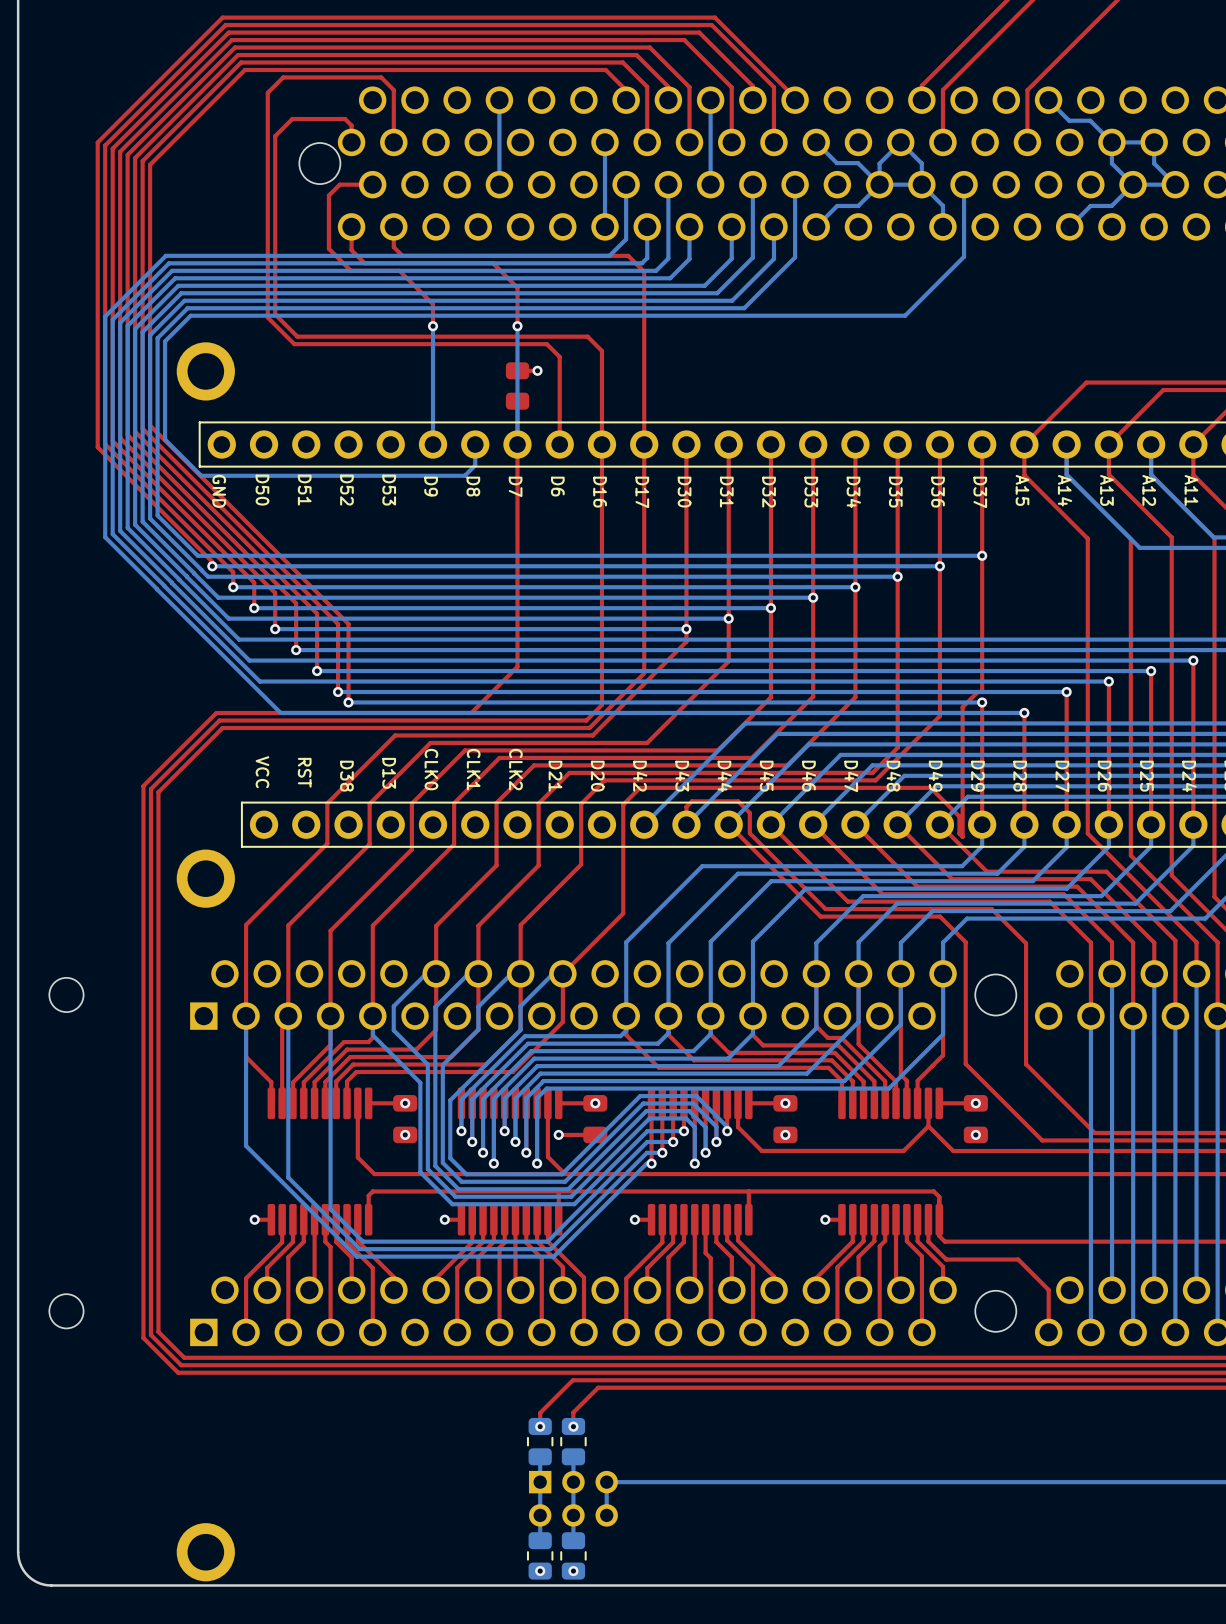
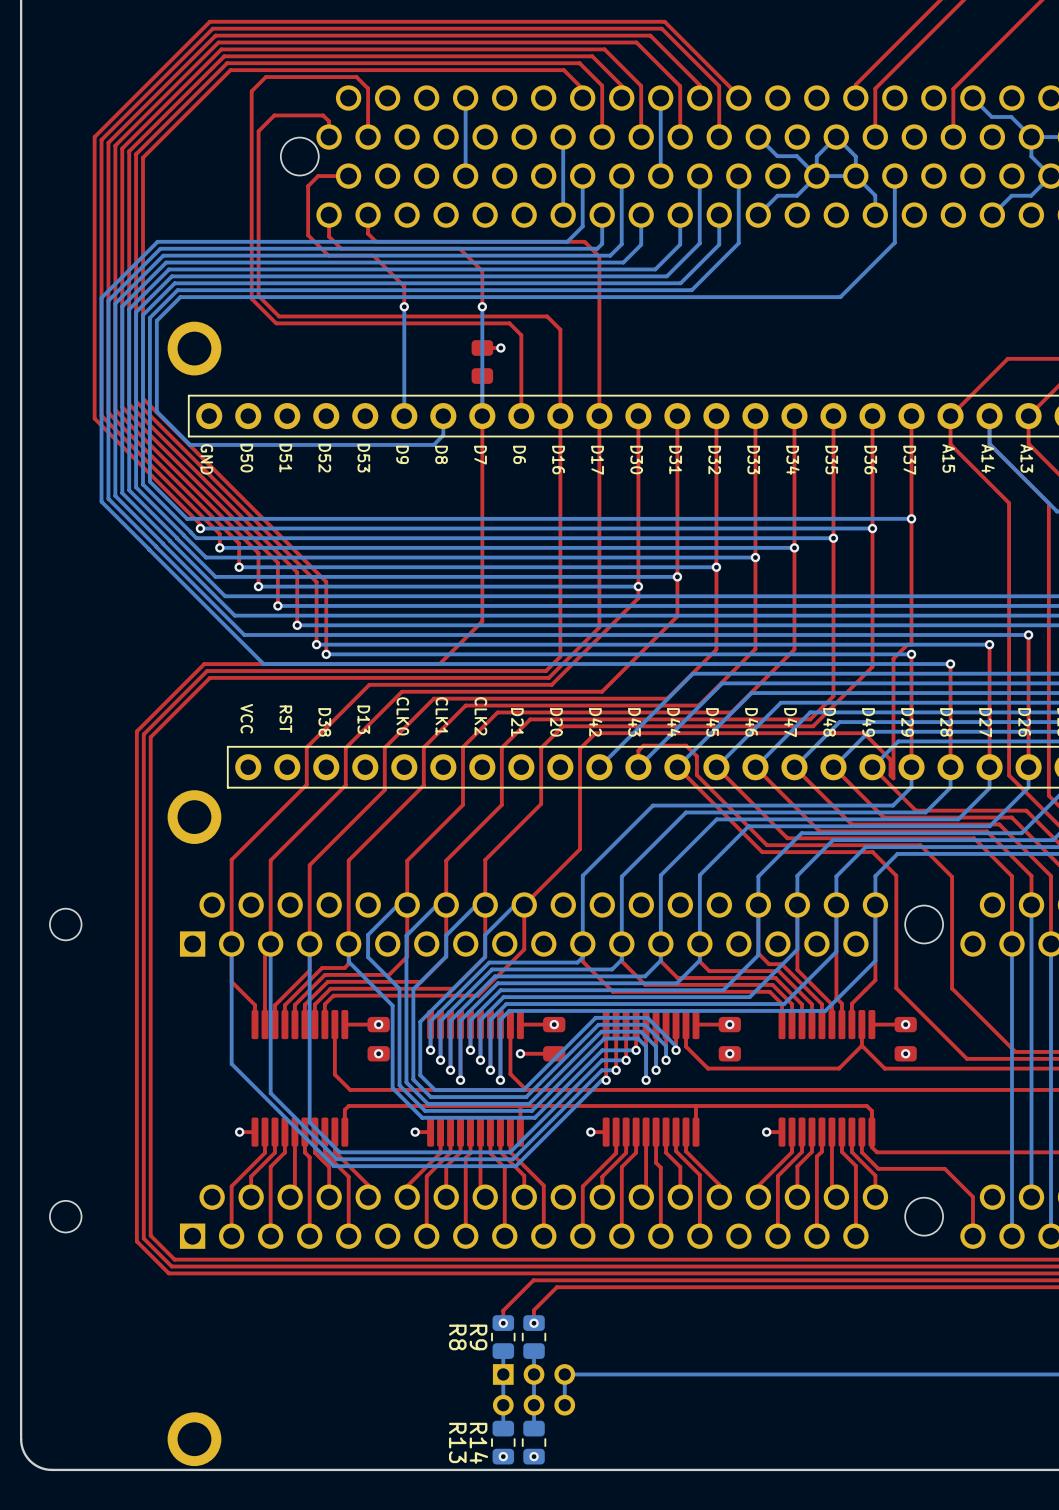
R8 name: none -> R8 (457, 1337)
R9 name: none -> R9 (478, 1337)
R13 name: none -> R13 (457, 1442)
R14 name: none -> R14 (478, 1443)

